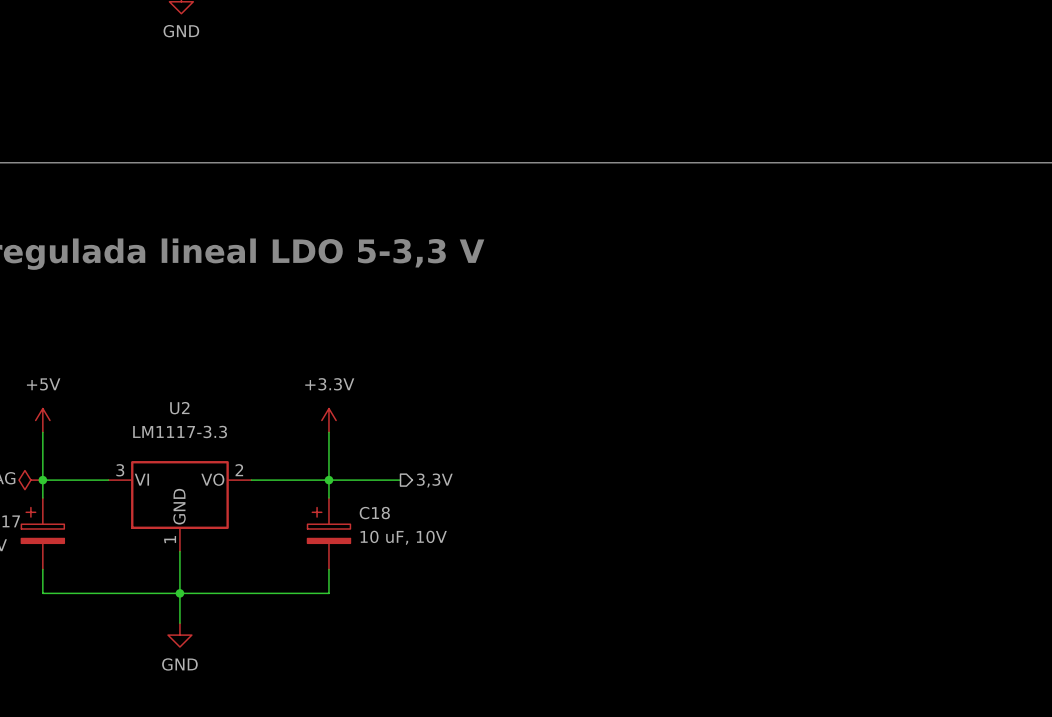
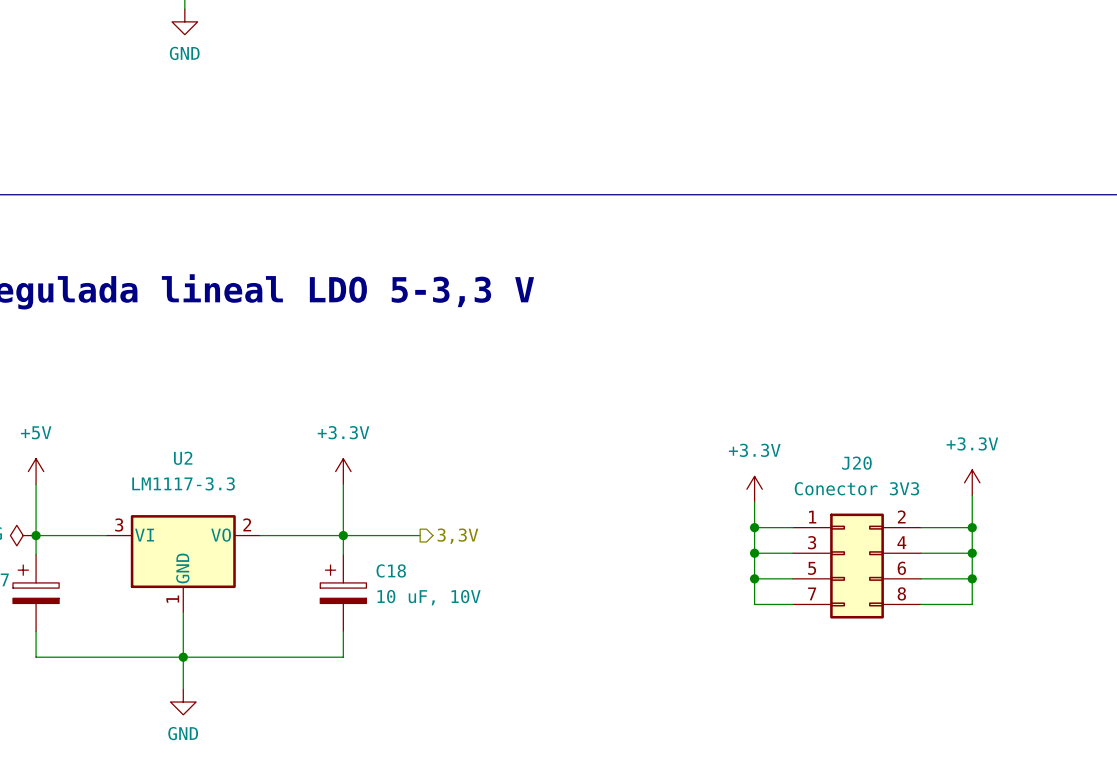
power symbol: none -> +3.3V (972, 482)
power symbol: none -> +3.3V (754, 489)
wire: none -> (972, 495) (972, 604) (921, 604)
wire: none -> (754, 502) (754, 604) (793, 604)
wire: none -> (754, 527) (793, 527)
junction: none -> (754, 527)
wire: none -> (921, 527) (972, 527)
junction: none -> (972, 527)
wire: none -> (754, 553) (793, 553)
junction: none -> (754, 553)
wire: none -> (921, 553) (972, 553)
junction: none -> (972, 553)
J20: none -> Conector 3V3 (857, 566)
wire: none -> (754, 578) (793, 578)
junction: none -> (754, 578)
wire: none -> (921, 578) (972, 578)
junction: none -> (972, 578)

